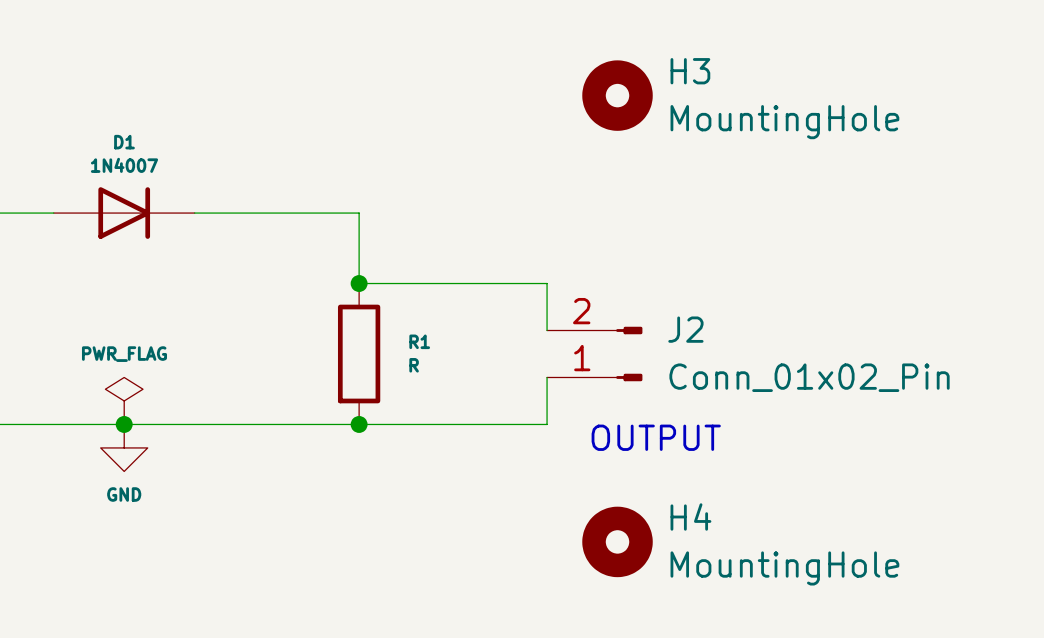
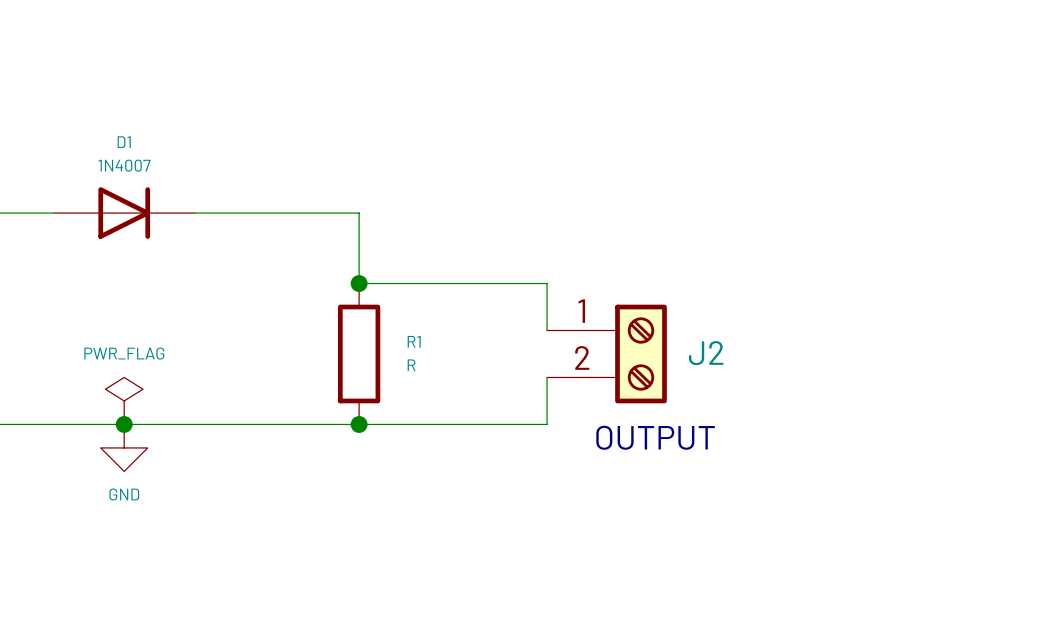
H3: MountingHole (617, 95) -> none
J2 symbol: [547, 326, 643, 382] -> [547, 304, 667, 404]
J2 value: Conn_01x02_Pin (809, 377) -> none
H4: MountingHole (617, 541) -> none

